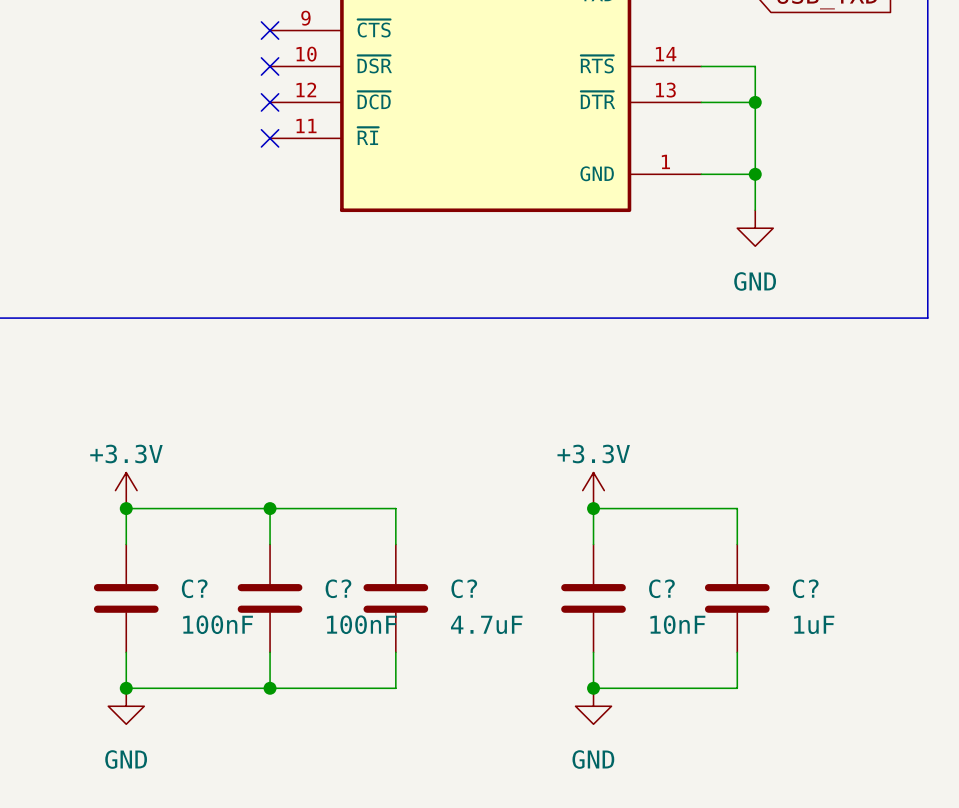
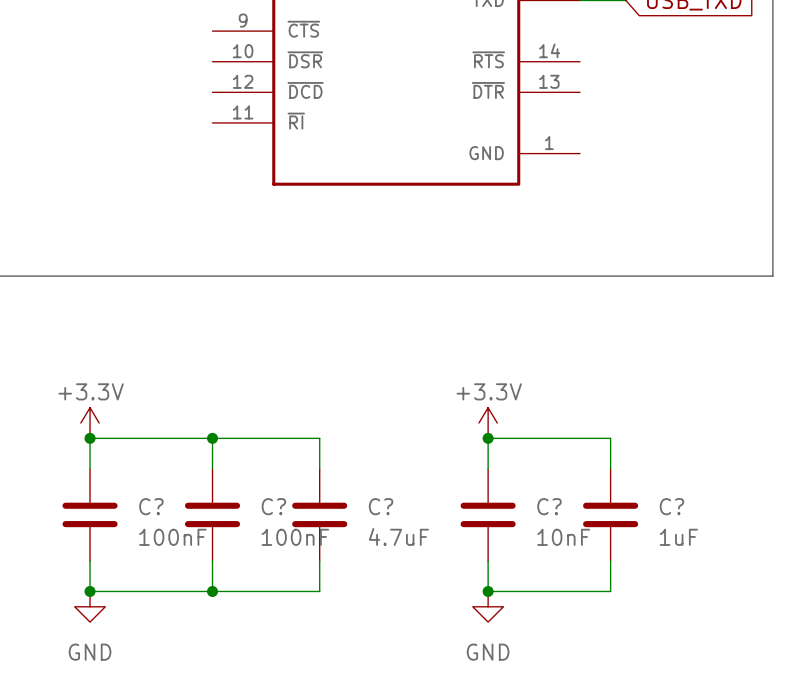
no-connect mark: (270, 30) -> none
no-connect mark: (270, 66) -> none
wire: (701, 66) (755, 66) (755, 210) -> none
no-connect mark: (270, 102) -> none
wire: (701, 102) (755, 102) -> none
junction: (755, 102) -> none
no-connect mark: (270, 138) -> none
wire: (701, 174) (755, 174) -> none
junction: (755, 174) -> none
power symbol: GND (755, 228) -> none

